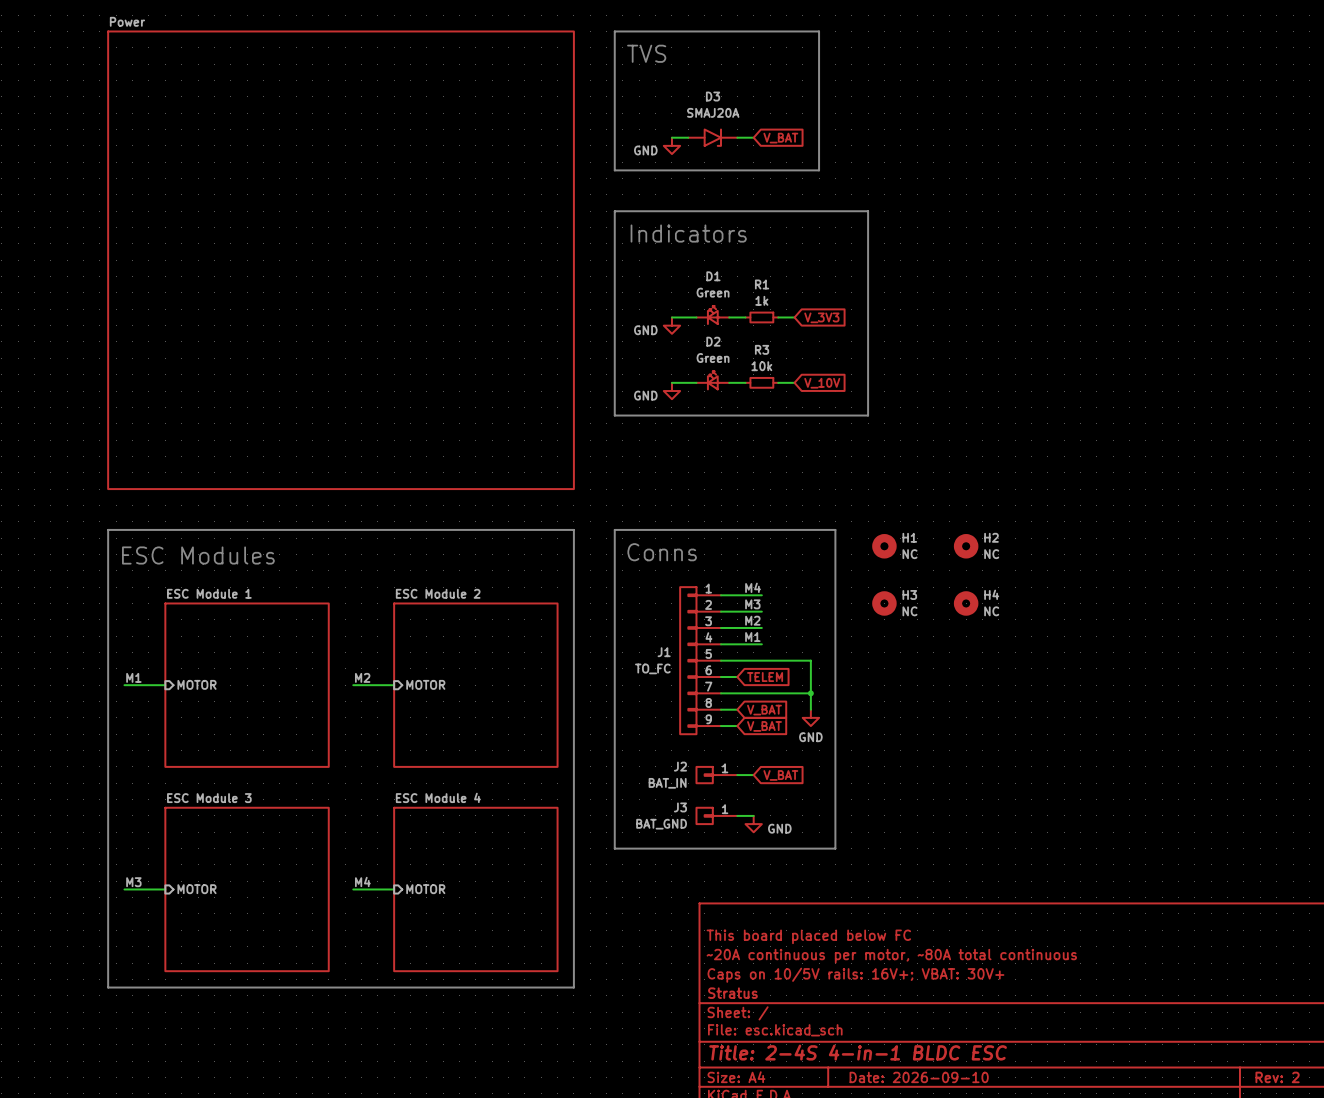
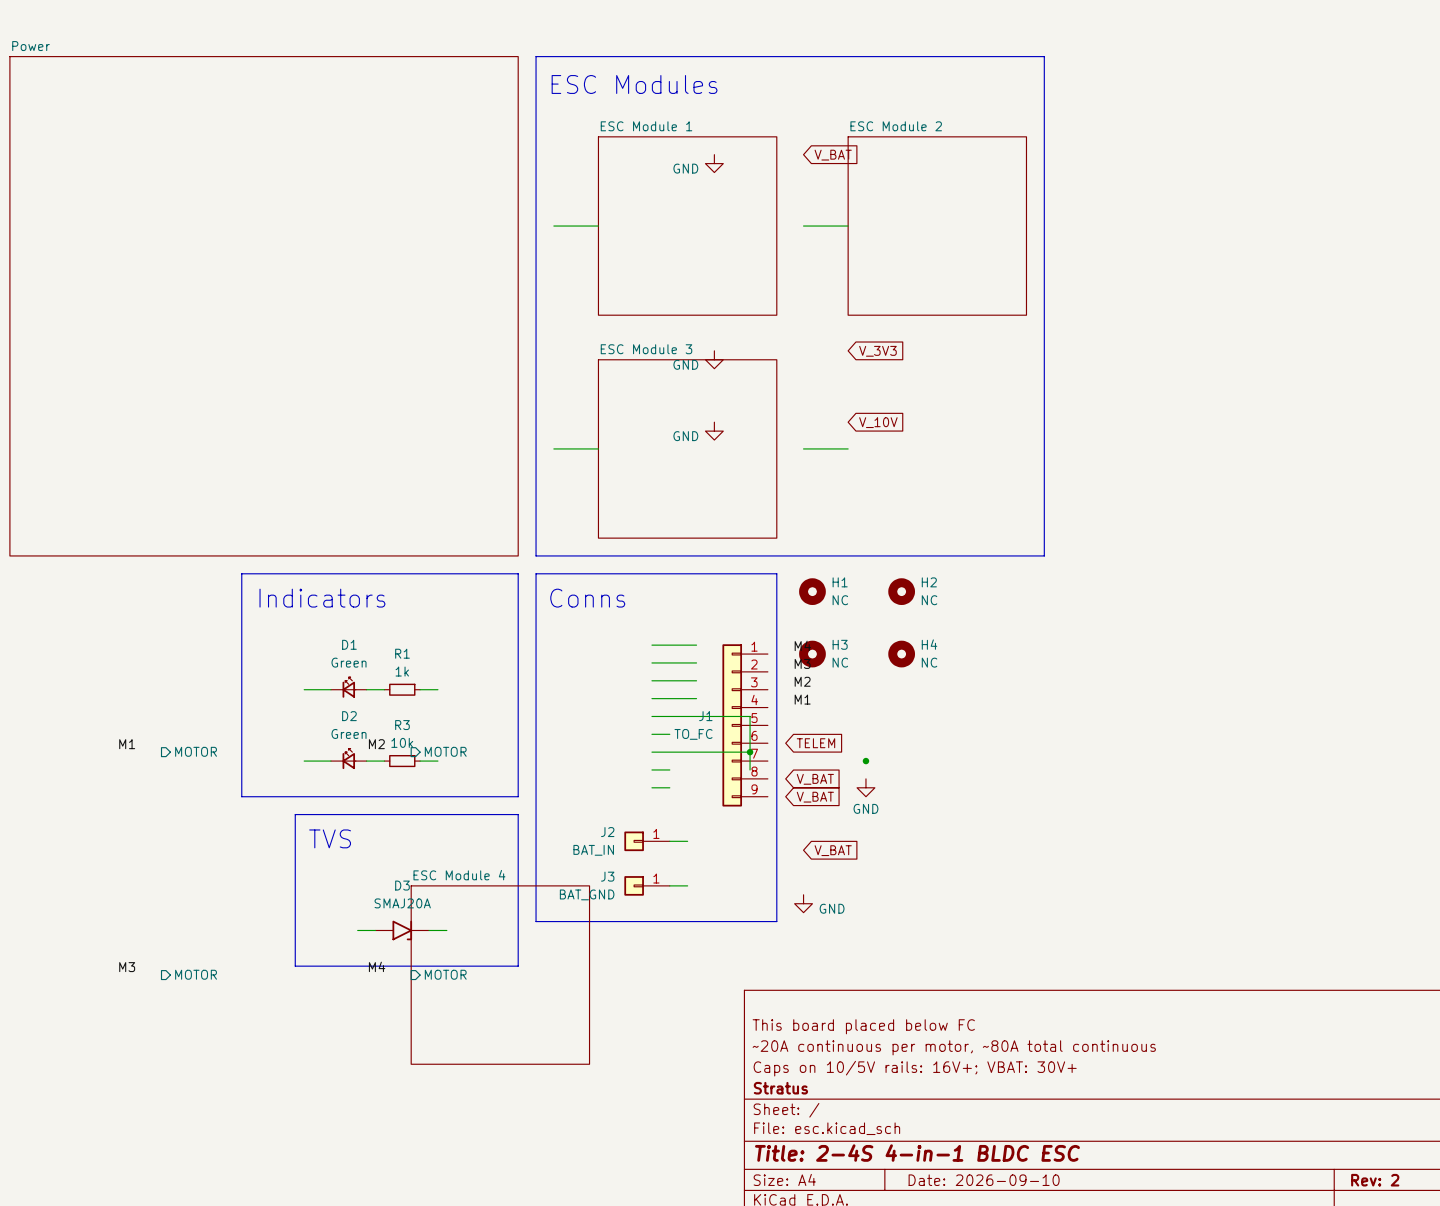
line: (614, 31) (614, 170) (819, 170) (819, 31) (614, 31) -> none
line: none -> (536, 56) (1044, 56) (1044, 555) (536, 555) (536, 56)
text: TVS (646, 53) -> none
text: none -> ESC Modules (634, 84)
wire: (671, 137) (688, 137) -> none
D3 position: (712, 137) -> (402, 930)
wire: (737, 137) (753, 137) -> none
wire: none -> (553, 226) (598, 226)
wire: none -> (803, 226) (848, 226)
line: (614, 211) (868, 211) (868, 415) (614, 415) (614, 211) -> none
text: Indicators (688, 233) -> none
sheet Power position: (341, 260) -> (264, 306)
D1 position: (712, 315) -> (348, 687)
wire: (671, 317) (696, 317) -> none
wire: (729, 317) (745, 317) -> none
R1 position: (761, 317) -> (402, 689)
wire: (778, 317) (794, 317) -> none
D2 position: (712, 380) -> (348, 758)
wire: (671, 382) (696, 382) -> none
wire: (729, 382) (745, 382) -> none
R3 position: (761, 382) -> (402, 761)
wire: (778, 382) (794, 382) -> none
wire: none -> (553, 448) (598, 448)
wire: none -> (803, 448) (848, 448)
line: none -> (241, 573) (518, 573) (518, 796) (241, 796) (241, 573)
line: (108, 529) (573, 529) (573, 987) (108, 987) (108, 529) -> none
line: (614, 529) (614, 848) (835, 848) (835, 529) (614, 529) -> (536, 573) (536, 921) (776, 921) (776, 573) (536, 573)
text: none -> Indicators (322, 598)
H1 position: (884, 546) -> (812, 591)
H2 position: (966, 546) -> (901, 591)
text position: Conns (662, 552) -> Conns (587, 598)
text: ESC Modules (198, 555) -> none
wire: (721, 595) (761, 595) -> (651, 645) (696, 645)
H3 position: (884, 603) -> (812, 654)
H4 position: (966, 603) -> (901, 654)
wire: (721, 611) (761, 611) -> (651, 662) (696, 662)
wire: none -> (304, 689) (330, 689)
wire: none -> (366, 689) (384, 689)
wire: none -> (420, 689) (437, 689)
wire: (721, 627) (761, 627) -> (651, 680) (696, 680)
wire: (721, 644) (761, 644) -> (651, 698) (696, 698)
wire: (721, 660) (810, 660) (810, 709) -> (651, 716) (750, 716) (750, 769)
wire: (721, 677) (737, 677) -> (651, 734) (669, 734)
wire: (124, 685) (165, 685) -> none
sheet ESC Module 1 position: (247, 685) -> (687, 226)
wire: (353, 685) (394, 685) -> none
sheet ESC Module 2 position: (475, 685) -> (937, 226)
junction: none -> (750, 752)
wire: none -> (304, 761) (330, 761)
wire: none -> (366, 761) (384, 761)
wire: none -> (420, 761) (437, 761)
wire: (721, 693) (810, 693) -> (651, 752) (750, 752)
wire: (721, 709) (737, 709) -> (651, 769) (669, 769)
wire: (721, 726) (737, 726) -> (651, 787) (669, 787)
line: none -> (295, 814) (518, 814) (518, 966) (295, 966) (295, 814)
text: none -> TVS (330, 838)
J2 position: (716, 775) -> (647, 841)
wire: (737, 775) (753, 775) -> (669, 841) (687, 841)
J3 position: (716, 815) -> (647, 885)
wire: (737, 815) (753, 815) -> (669, 885) (687, 885)
wire: none -> (357, 930) (375, 930)
wire: none -> (429, 930) (446, 930)
wire: (124, 889) (165, 889) -> none
sheet ESC Module 3 position: (247, 889) -> (687, 448)
wire: (353, 889) (394, 889) -> none

